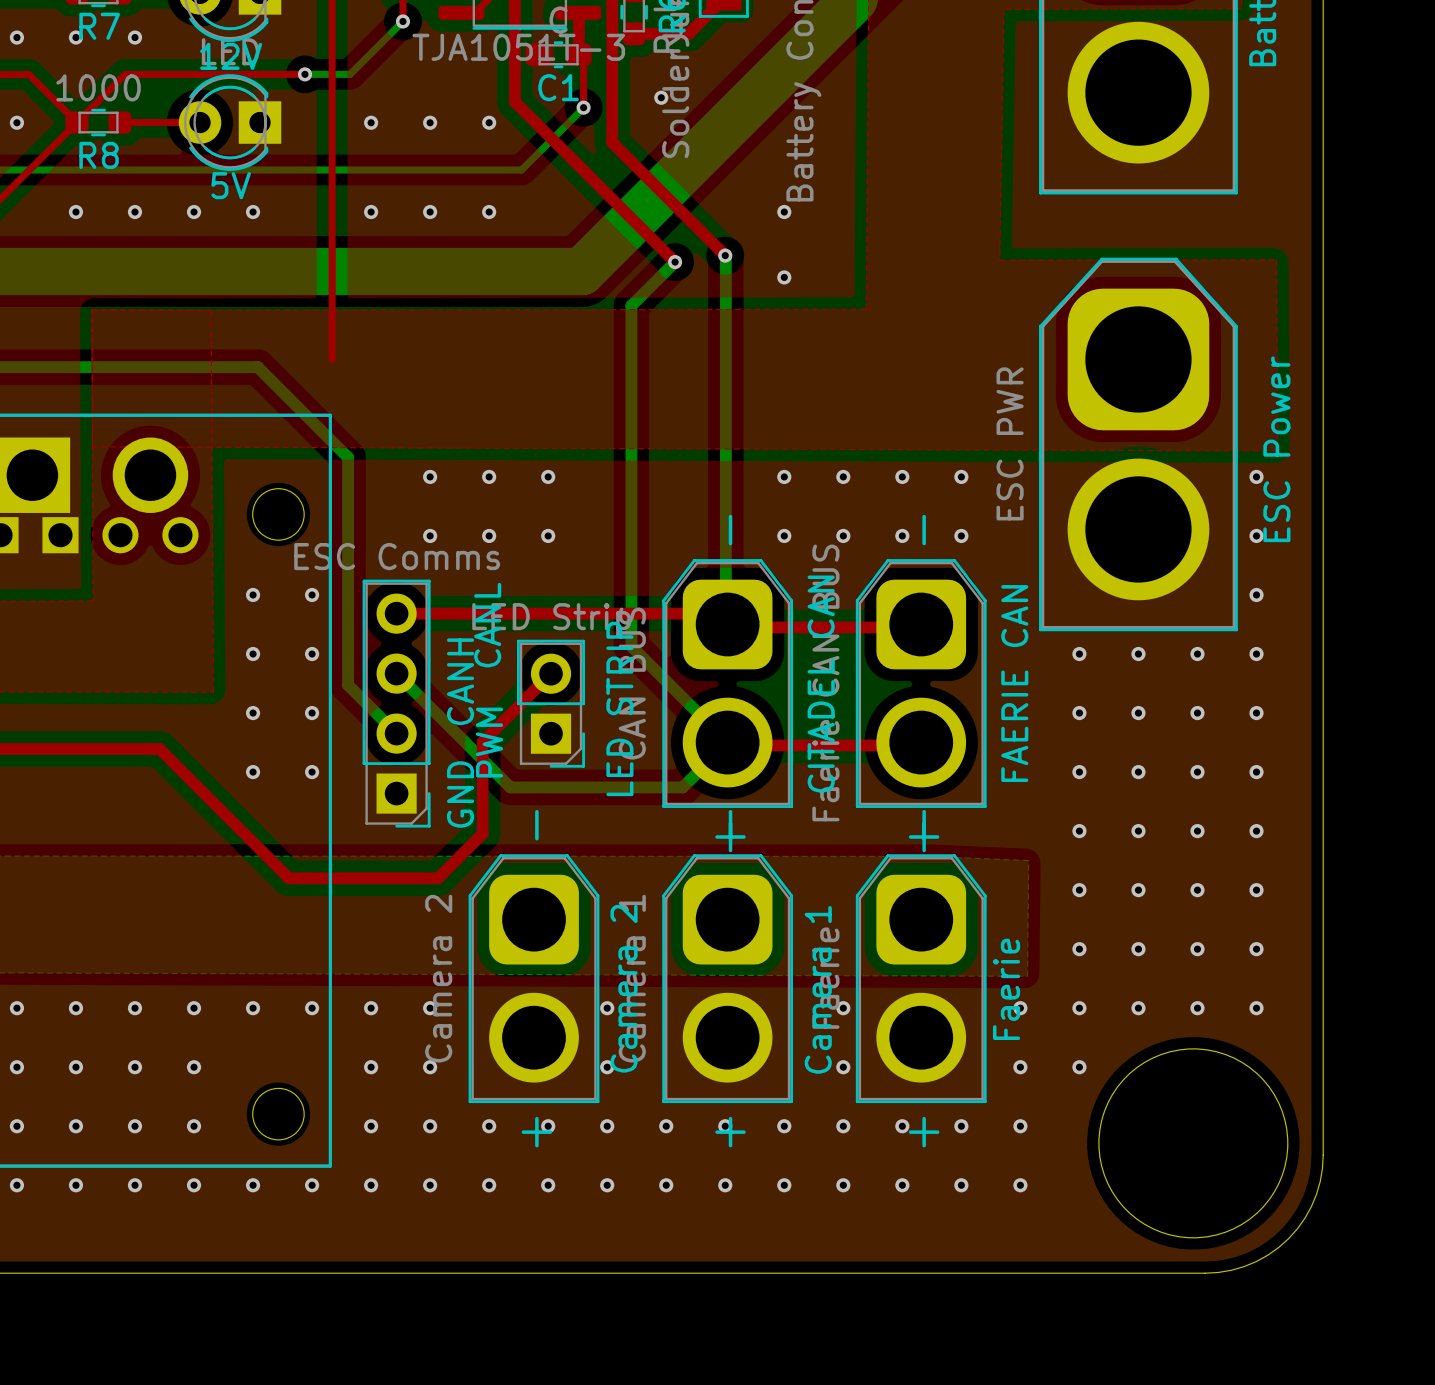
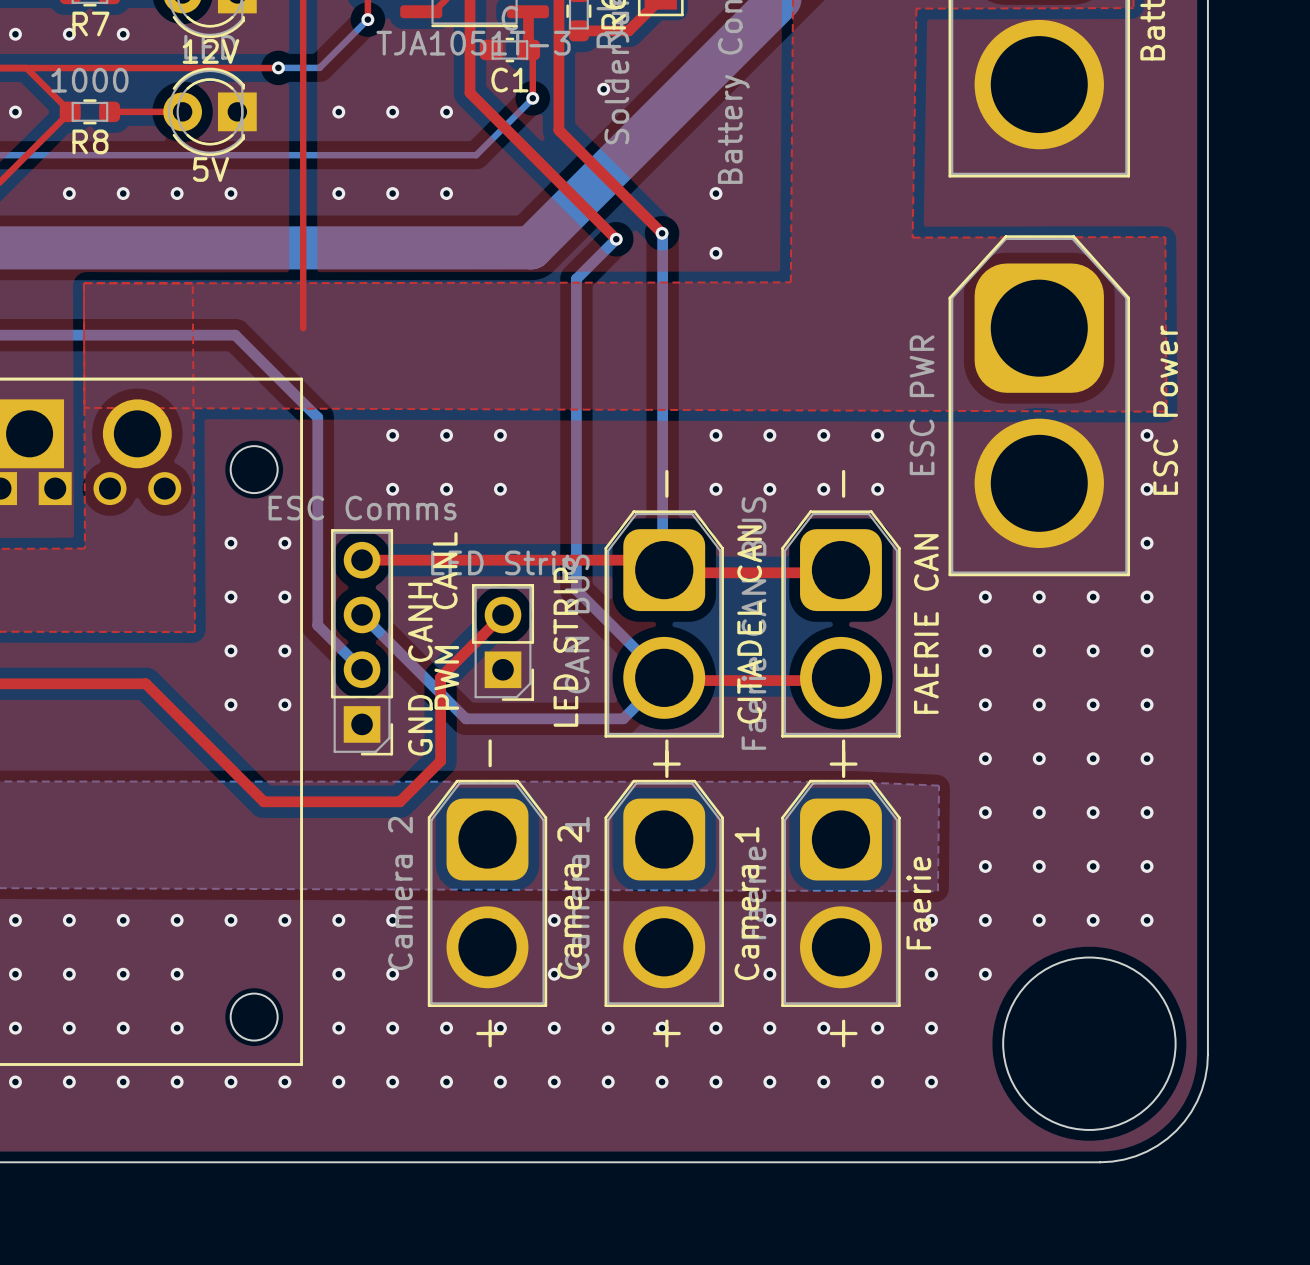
top track: (304, 74) (125, 74) (76, 122) -> (278, 68) (26, 68)

